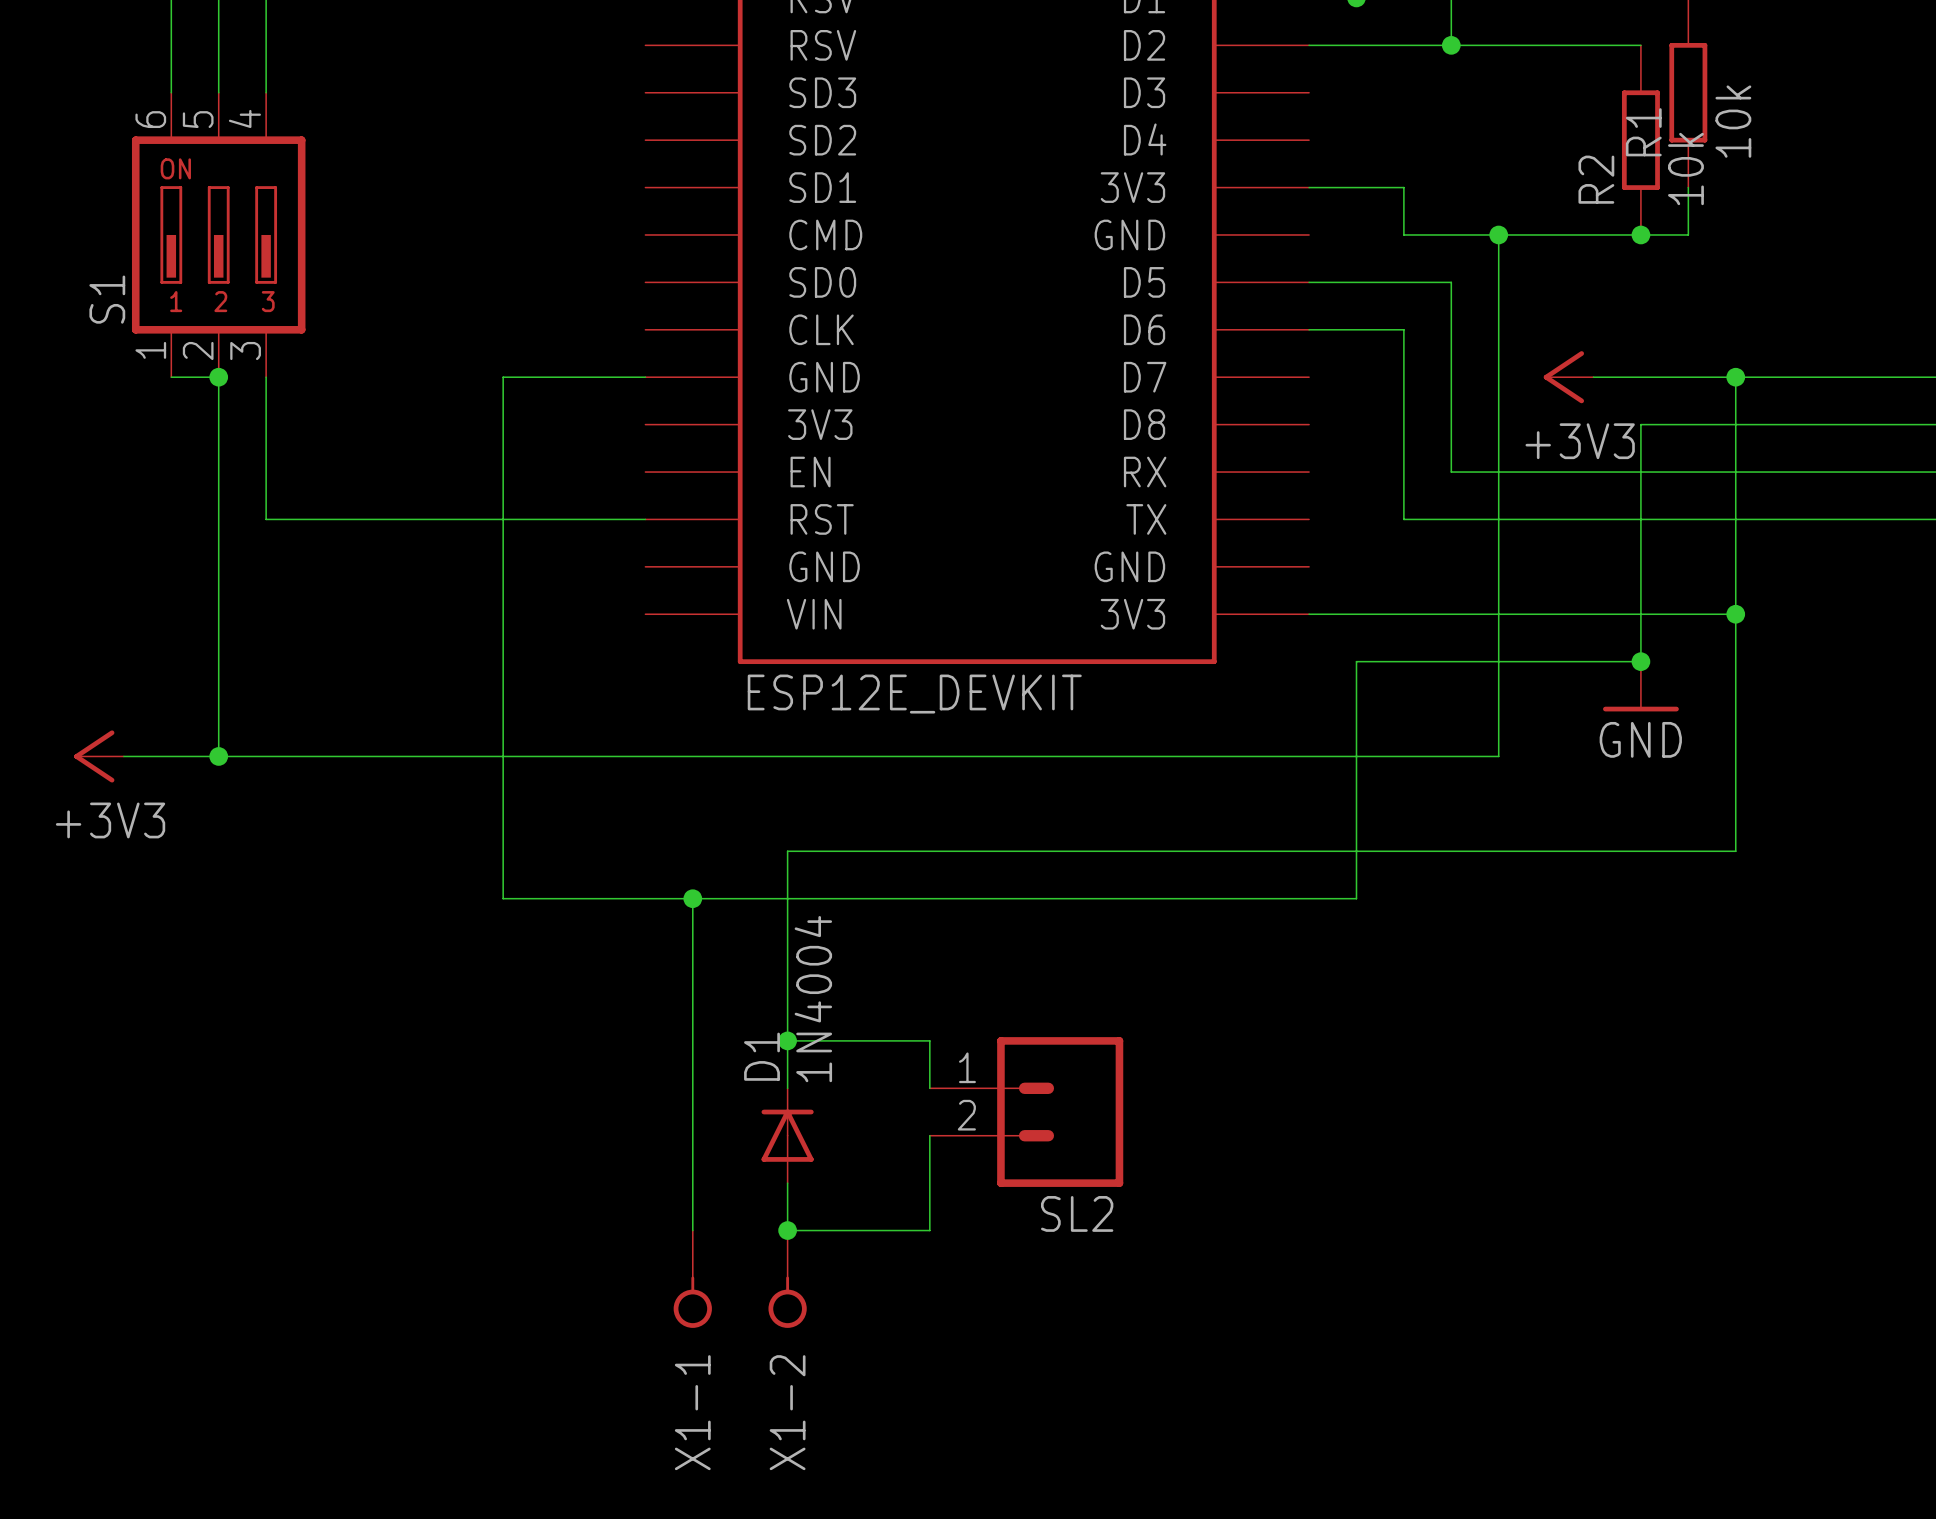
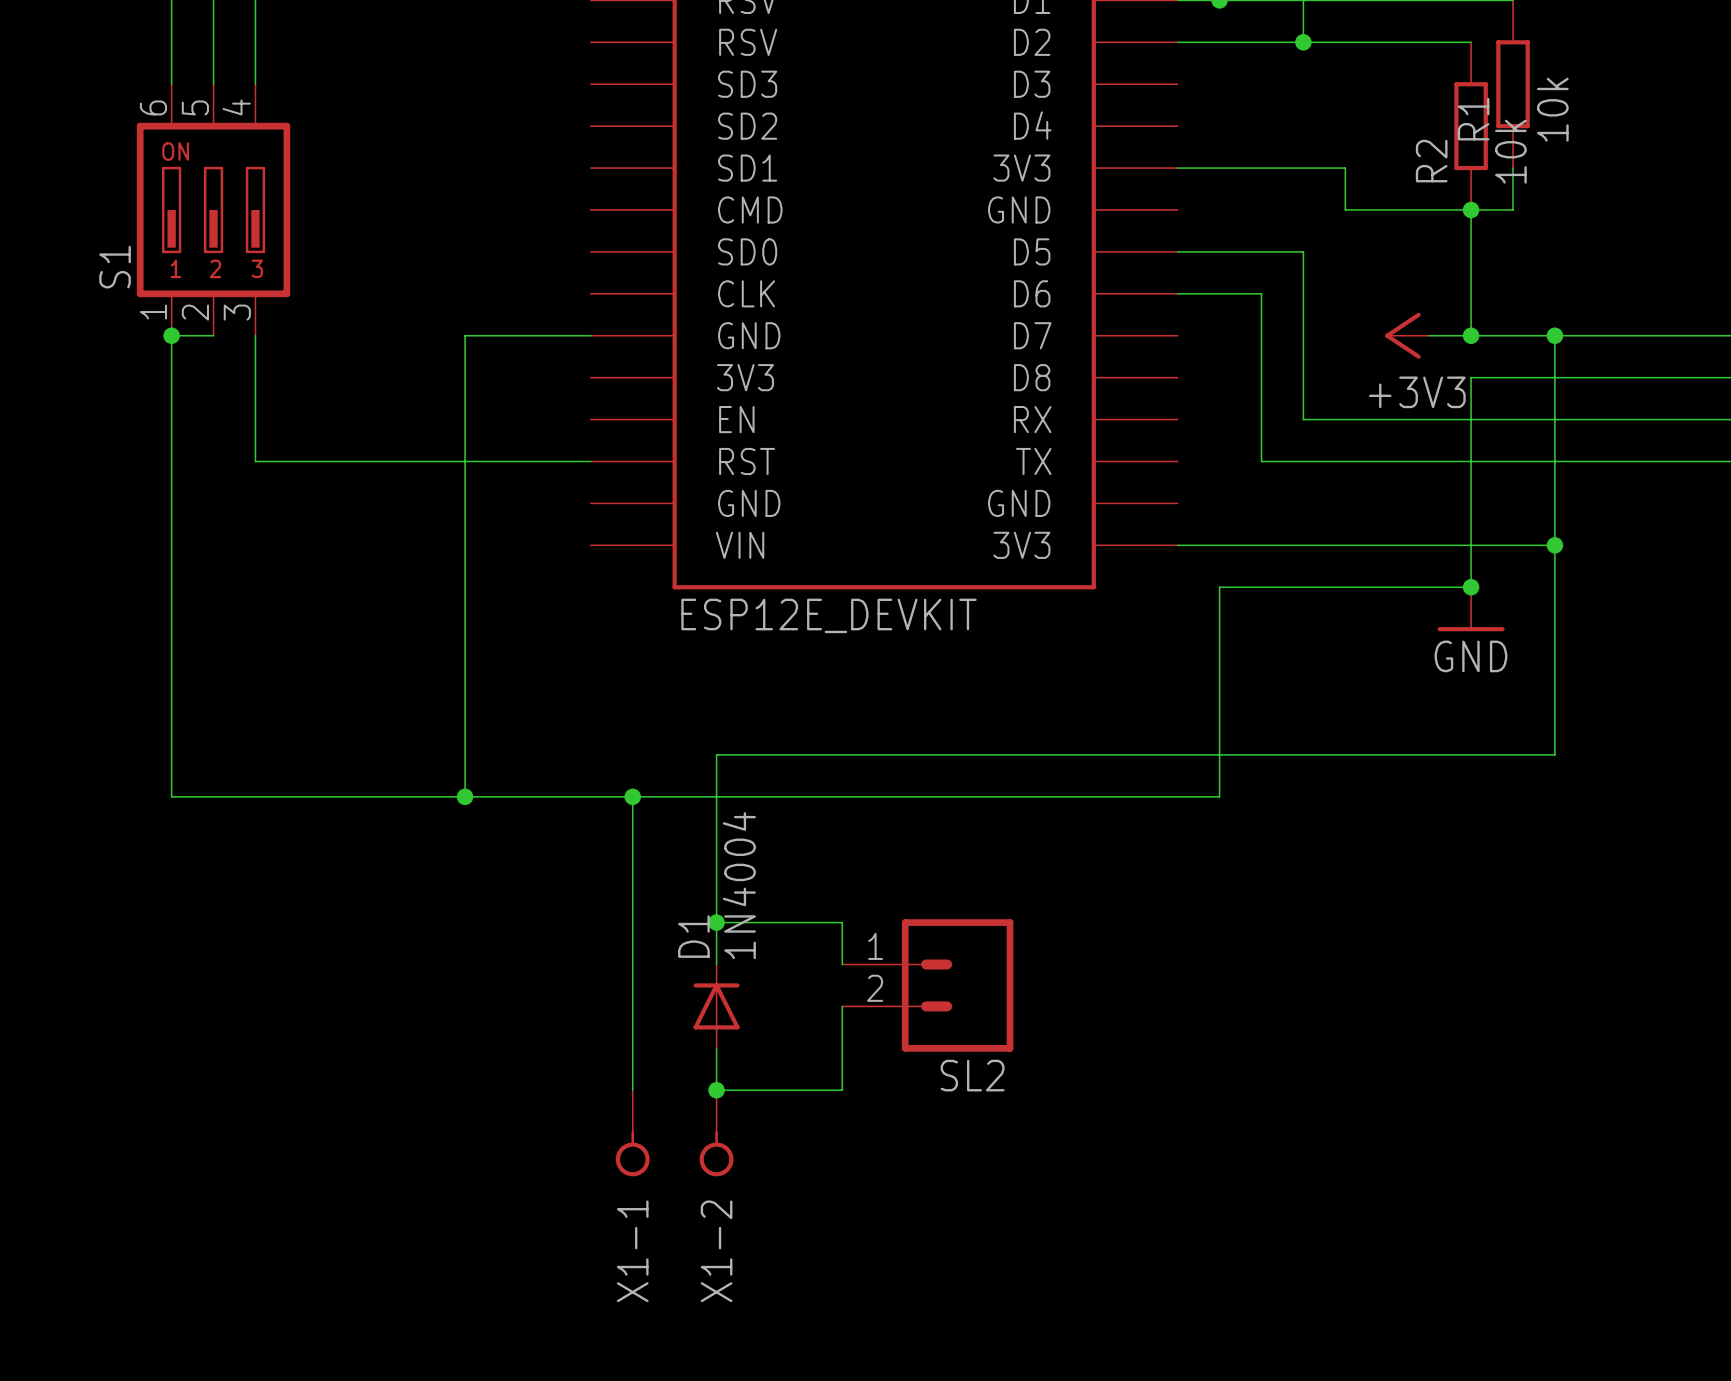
wire: (1403, 187) (1403, 234) (1498, 234) (1498, 756) (123, 756) -> (1261, 168) (1345, 168) (1345, 209)
junction: (1498, 234) -> none
wire: none -> (1471, 209) (1471, 335)
wire: none -> (171, 335) (171, 796) (465, 796)
wire: (218, 377) (218, 756) -> none
junction position: (218, 377) -> (171, 335)
junction: none -> (1471, 335)
power symbol: +3V3 (99, 756) -> none
junction: (218, 756) -> none
junction: none -> (465, 796)

